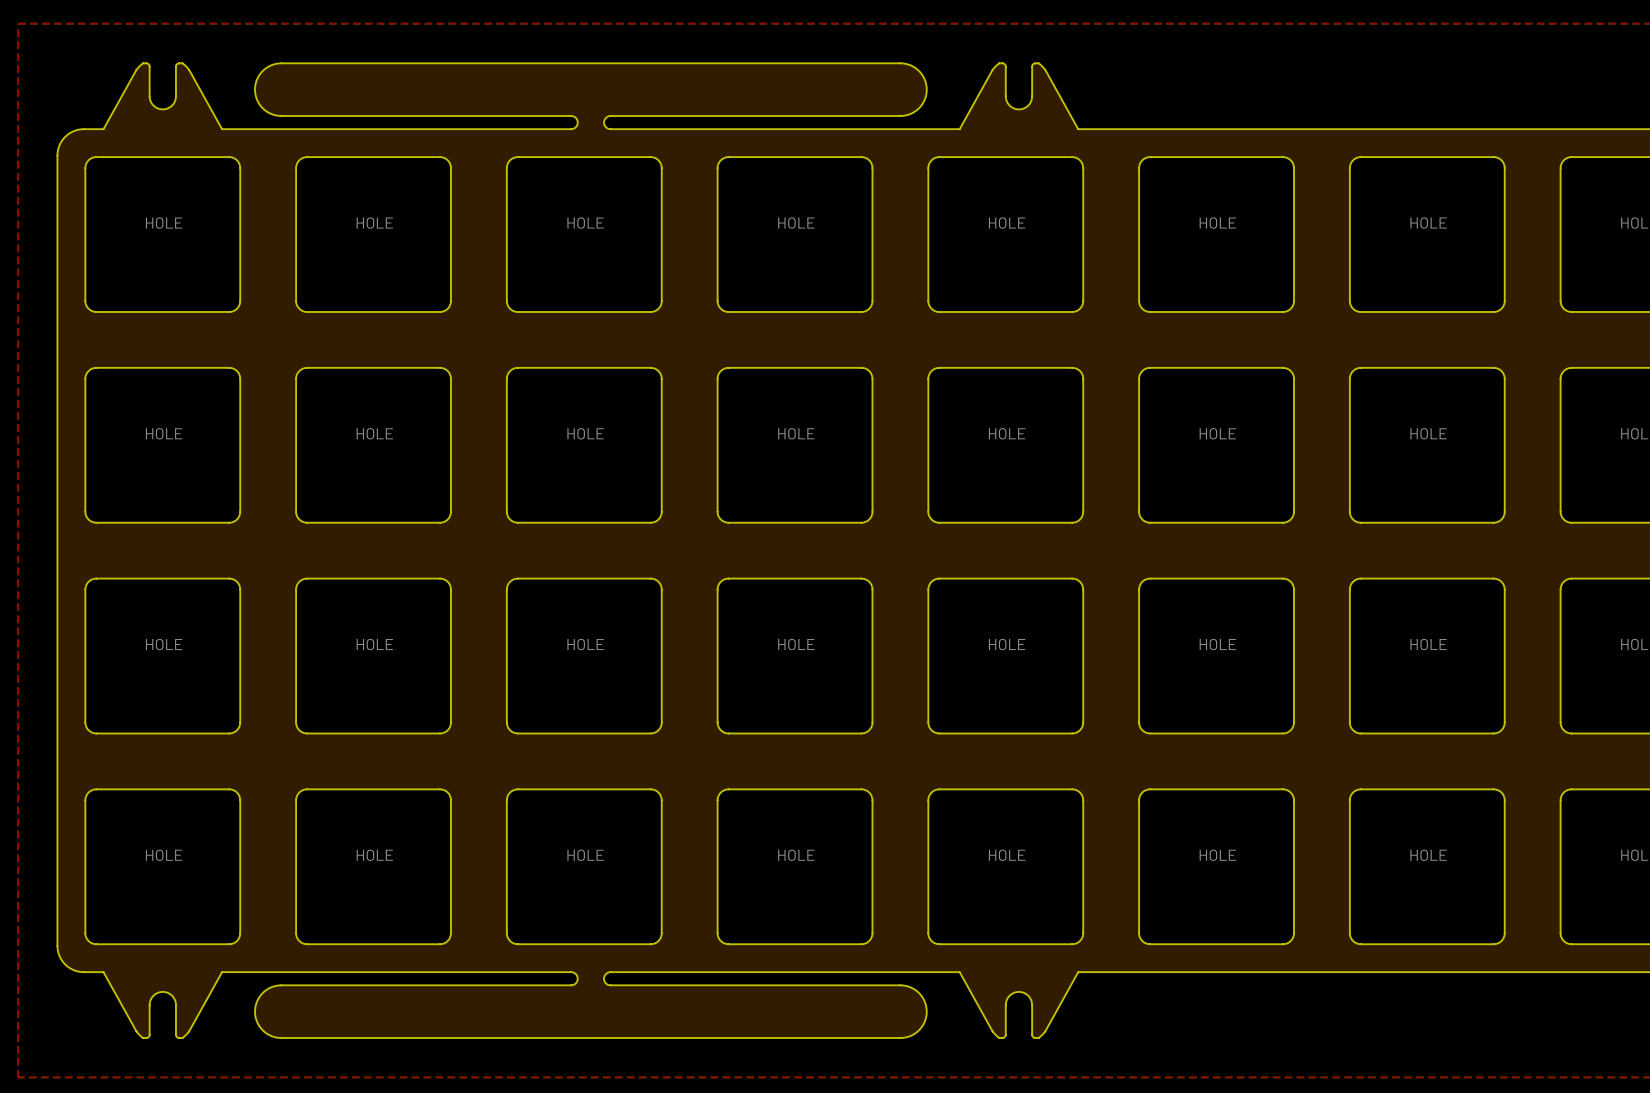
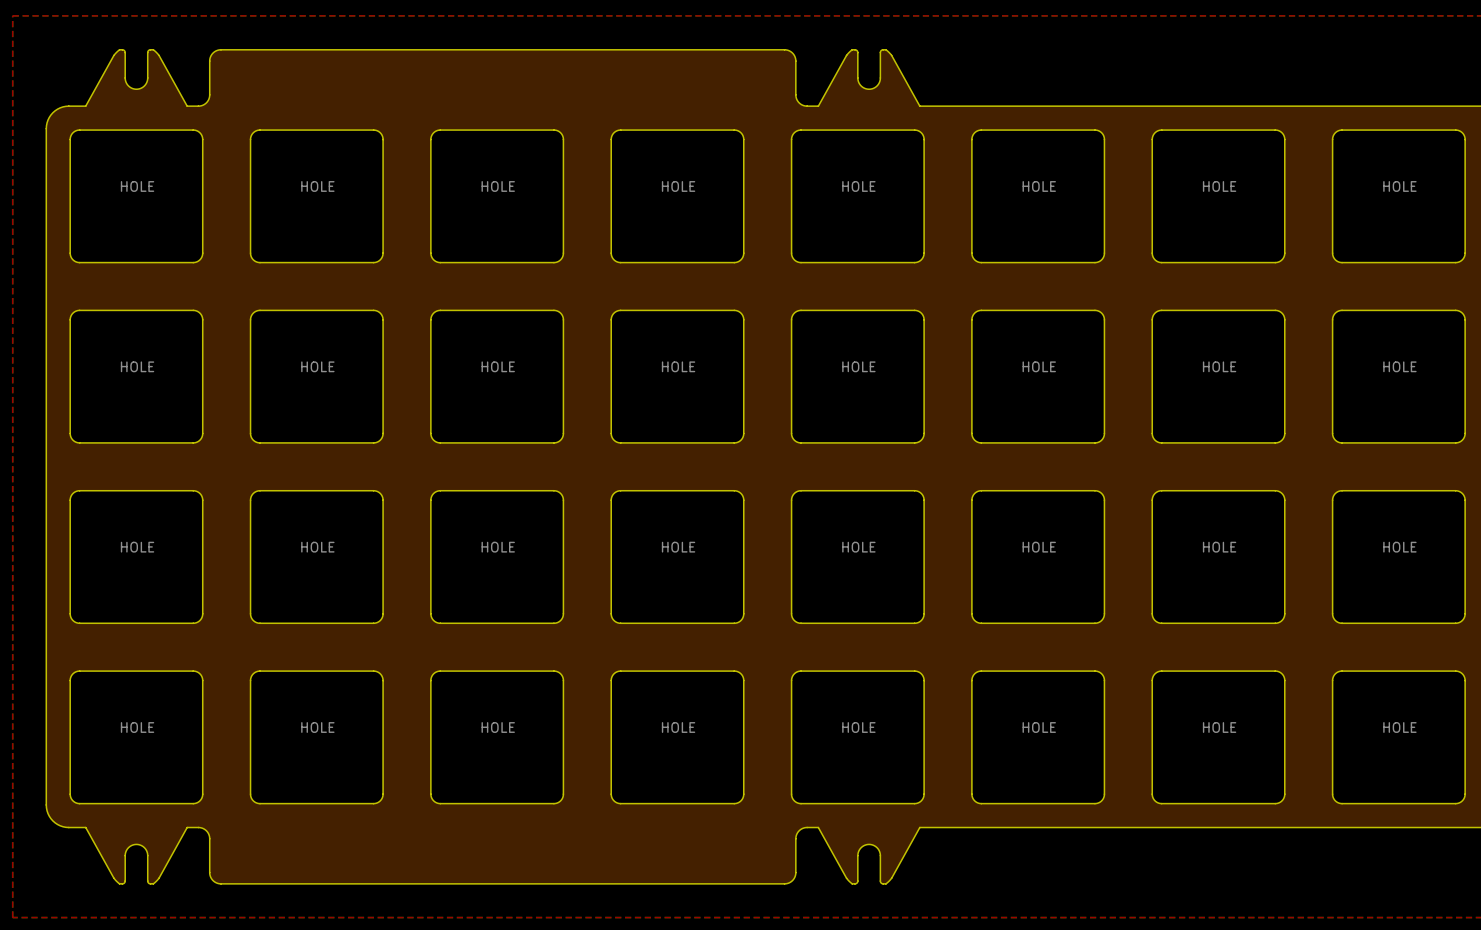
board edge: (281, 63) (271, 65) (263, 69) (258, 77) (255, 86) (255, 95) (259, 104) (266, 111) (275, 115) (571, 116) (576, 118) (577, 124) (571, 129) (235, 129) -> (237, 49) (218, 50) (211, 55) (209, 97) (205, 103) (198, 106)
board edge: (900, 63) (909, 65) (917, 69) (923, 77) (926, 86) (926, 95) (922, 104) (915, 111) (906, 115) (610, 116) (605, 118) (604, 124) (610, 129) (946, 129) -> (767, 49) (787, 50) (794, 55) (796, 97) (800, 103) (807, 106)
board edge: (235, 972) (571, 972) (577, 977) (576, 983) (571, 985) (275, 986) (266, 989) (259, 996) (255, 1005) (255, 1014) (258, 1023) (263, 1031) (271, 1036) (281, 1038) -> (198, 827) (205, 829) (209, 836) (211, 878) (218, 883) (237, 883)
board edge: (959, 972) (610, 972) (605, 974) (604, 978) (605, 983) (610, 985) -> (818, 827) (803, 828) (796, 833) (795, 873) (792, 880) (785, 883) (767, 883)
board edge: (610, 985) (903, 985) (912, 988) (920, 994) (926, 1005) (926, 1014) (923, 1023) (917, 1031) (909, 1036) (900, 1038) -> none

